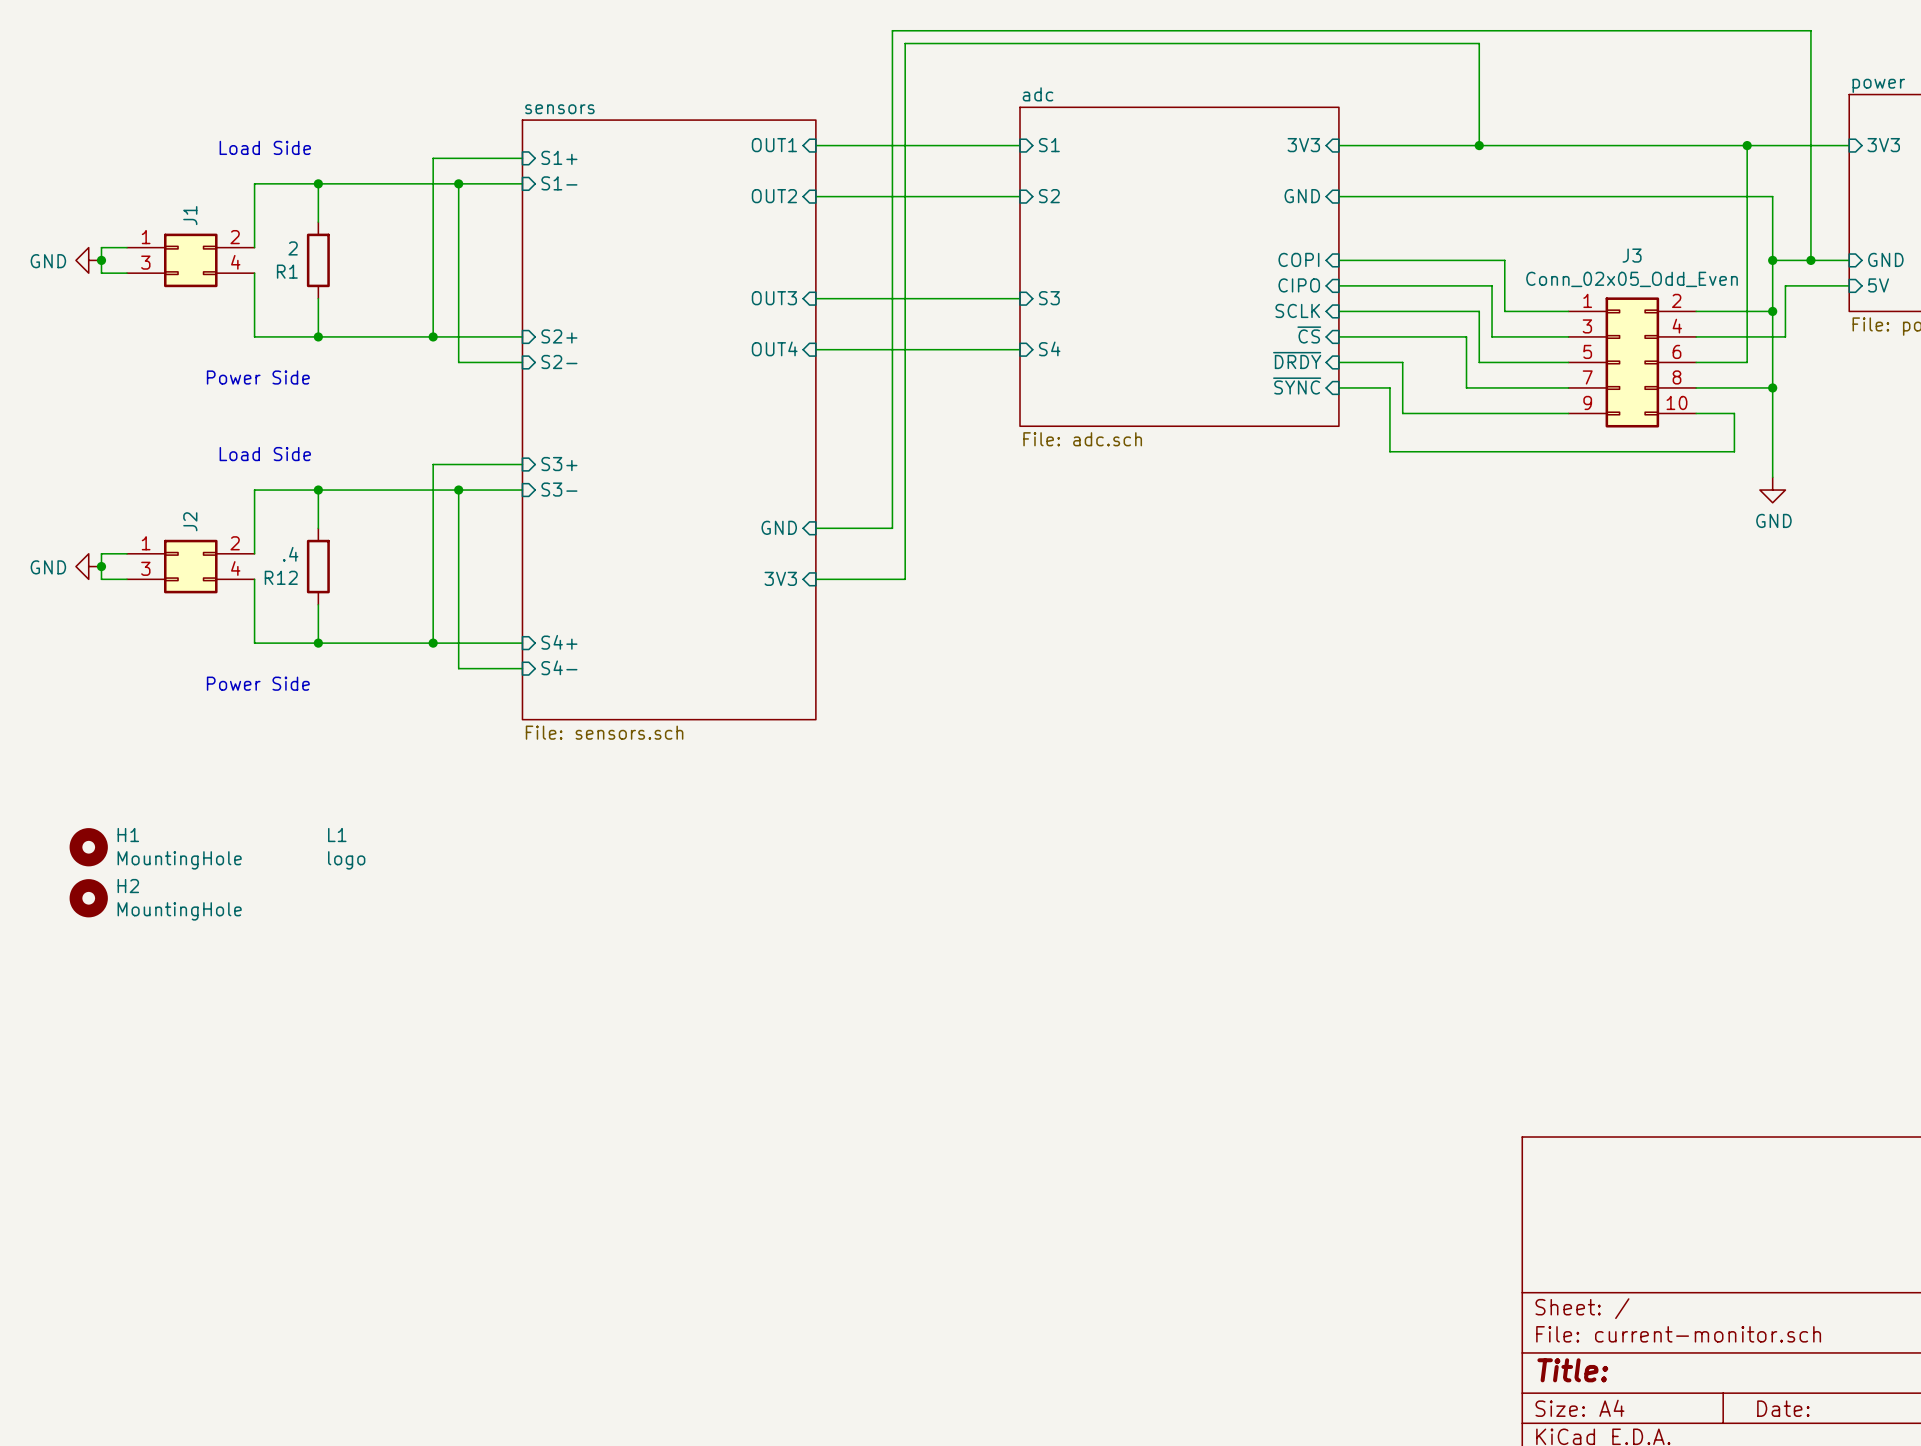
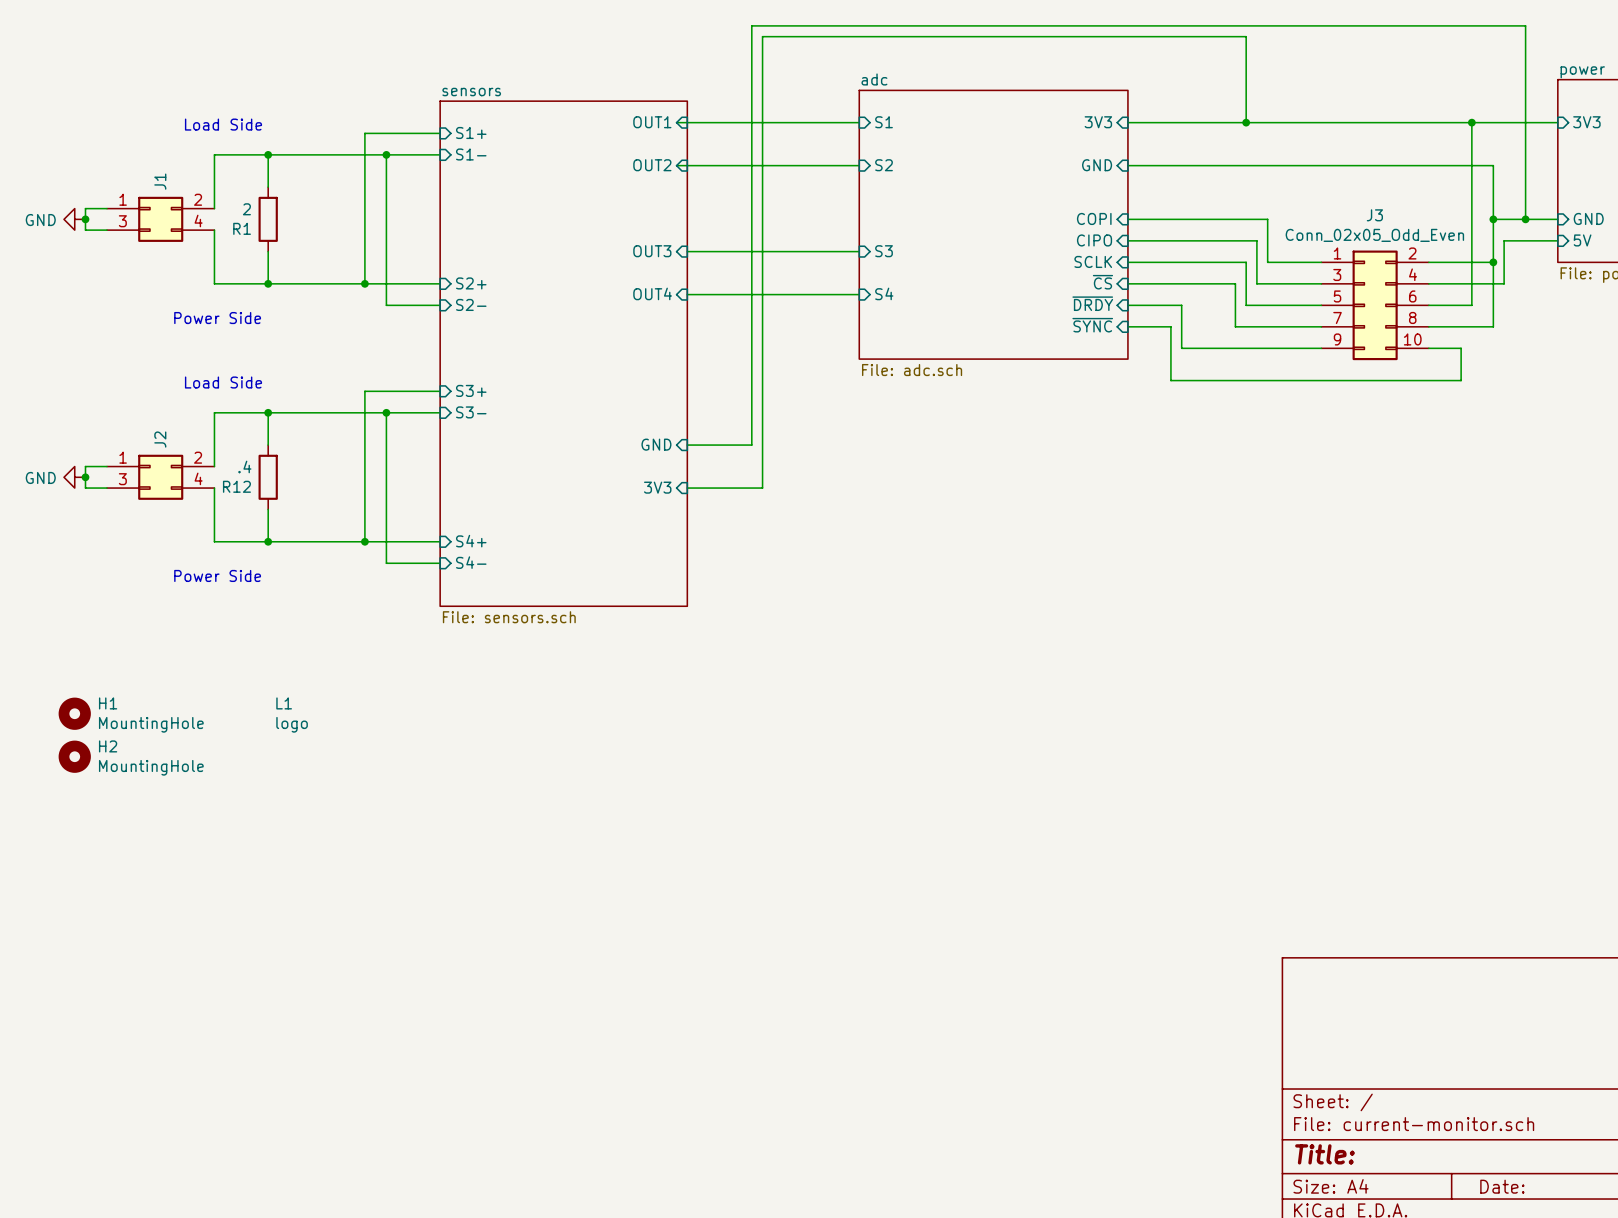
wire: none -> (676, 122) (687, 122)
wire: none -> (676, 165) (687, 165)
wire: (1772, 387) (1772, 477) -> none
junction: (1772, 387) -> none
power symbol: GND (1772, 490) -> none

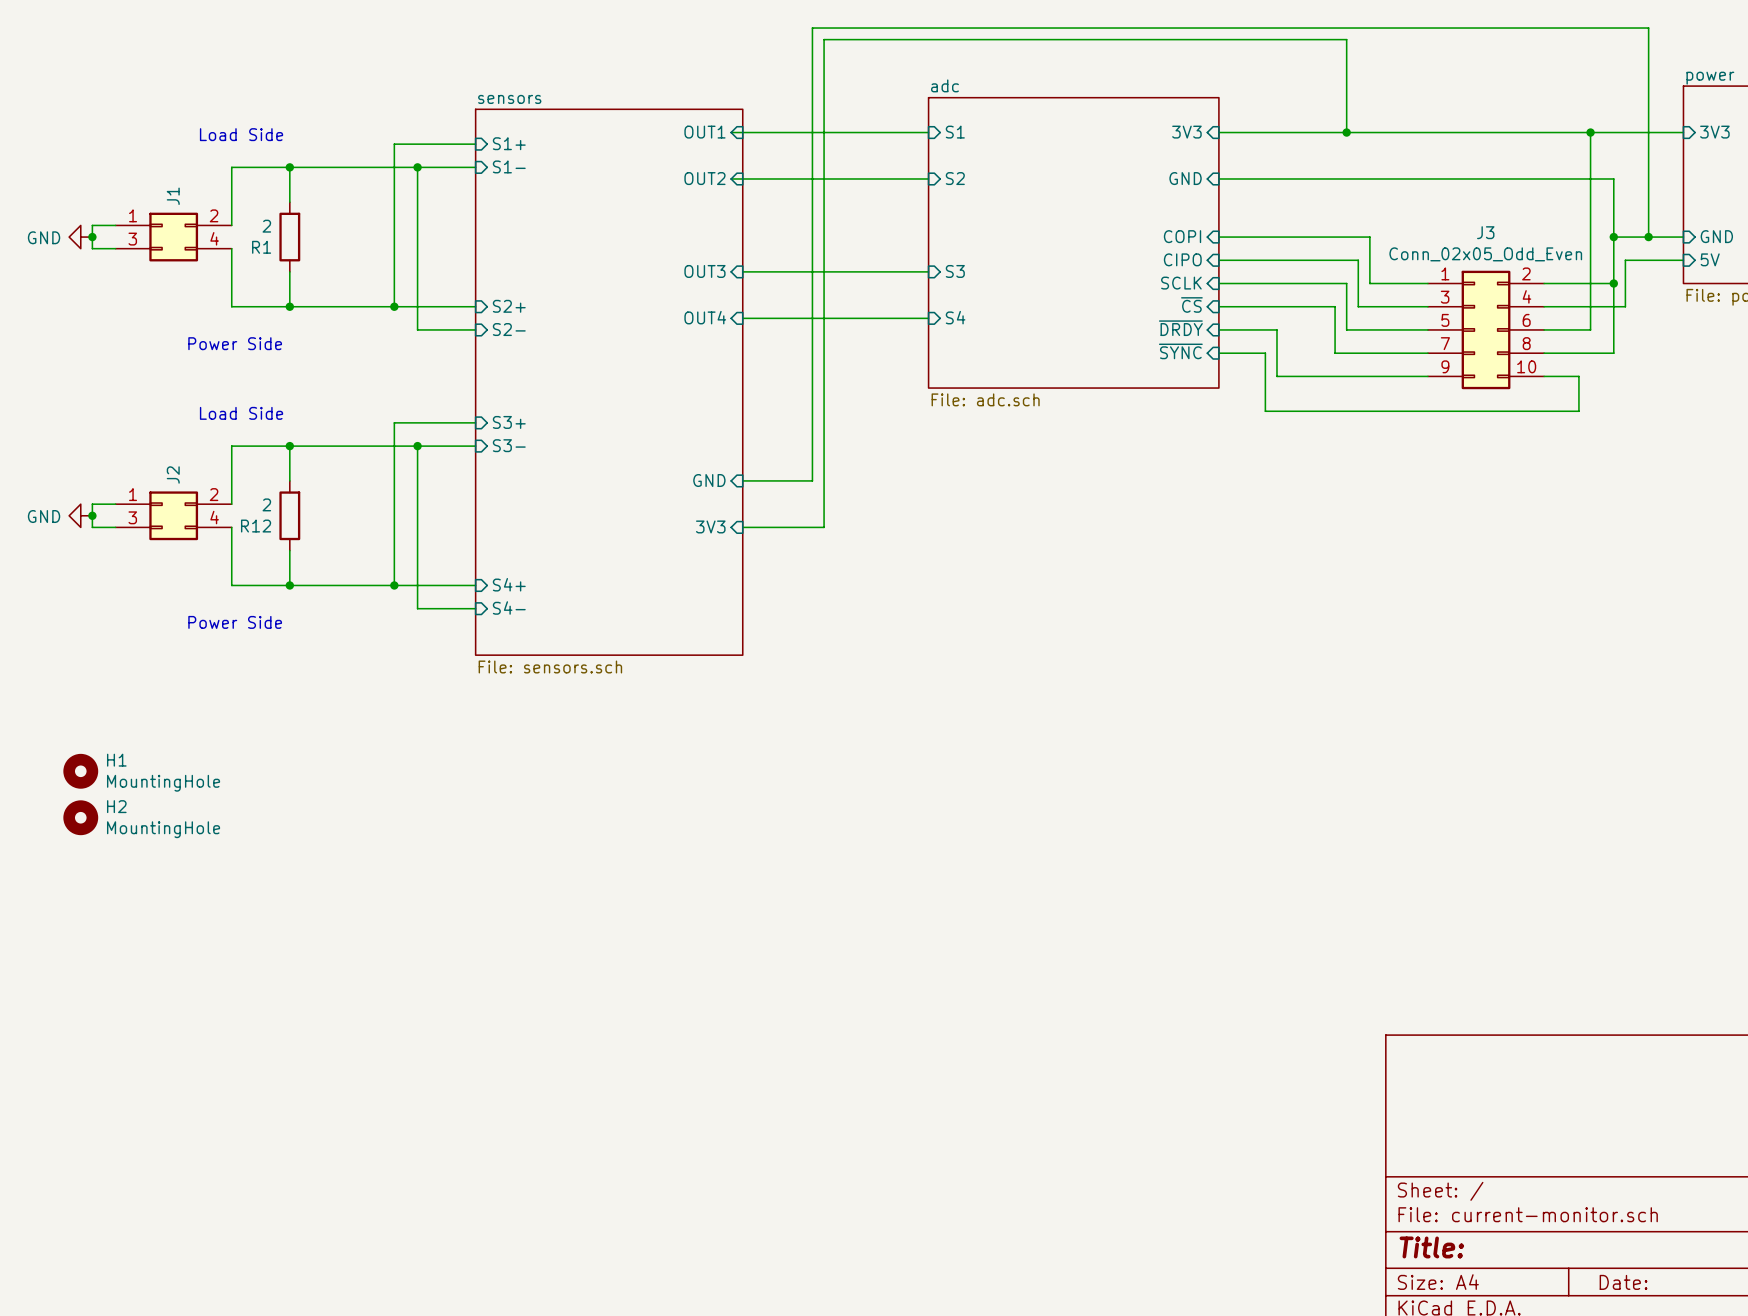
R12 value: .4 (244, 466) -> 2 (266, 504)
L1: logo (292, 715) -> none

